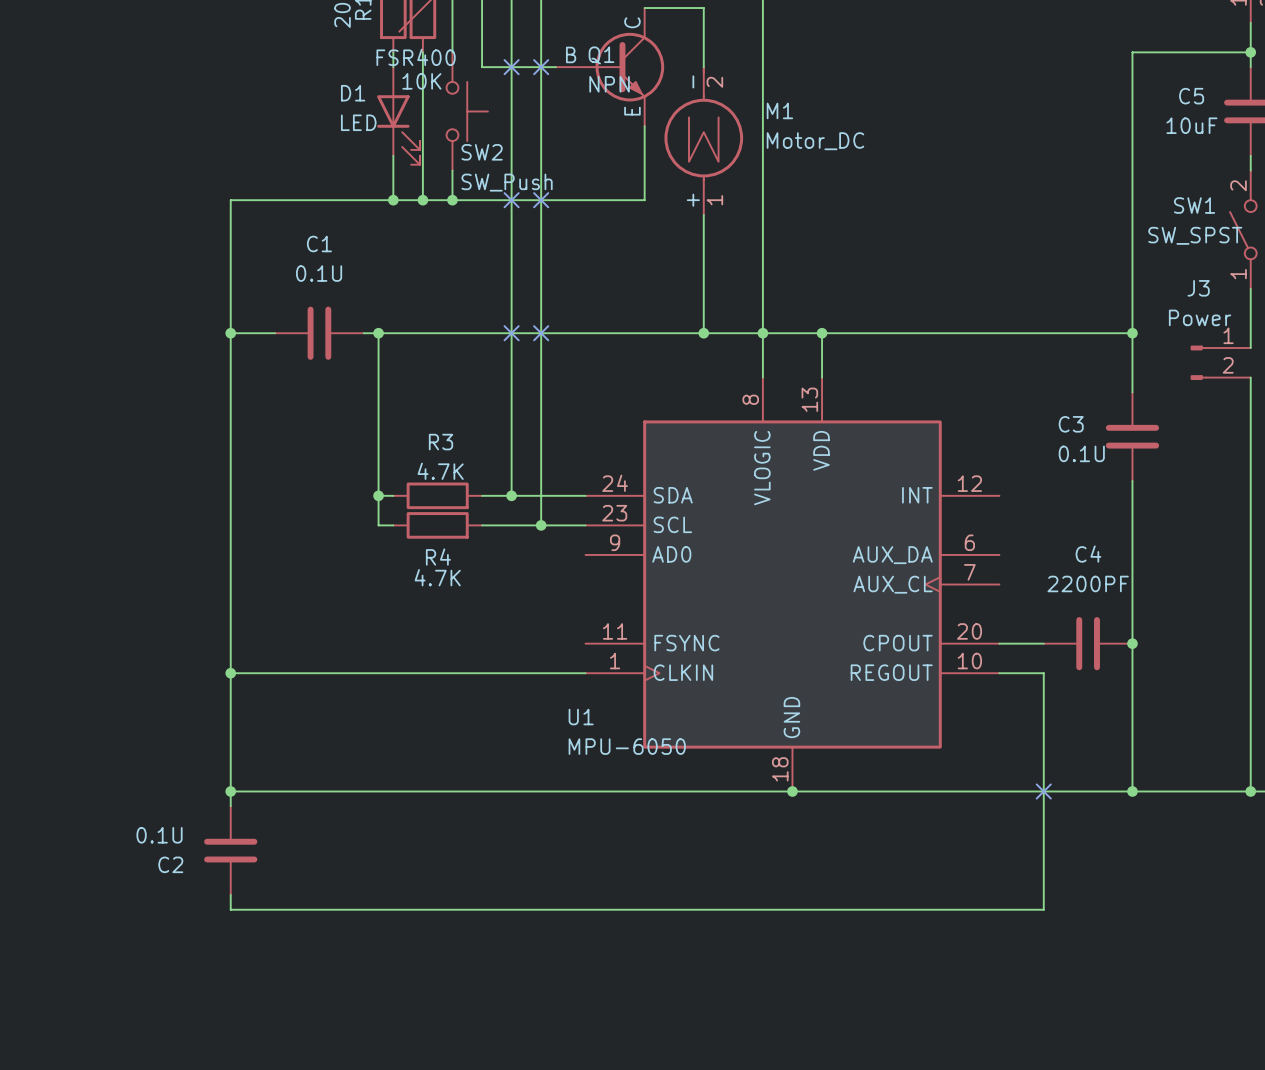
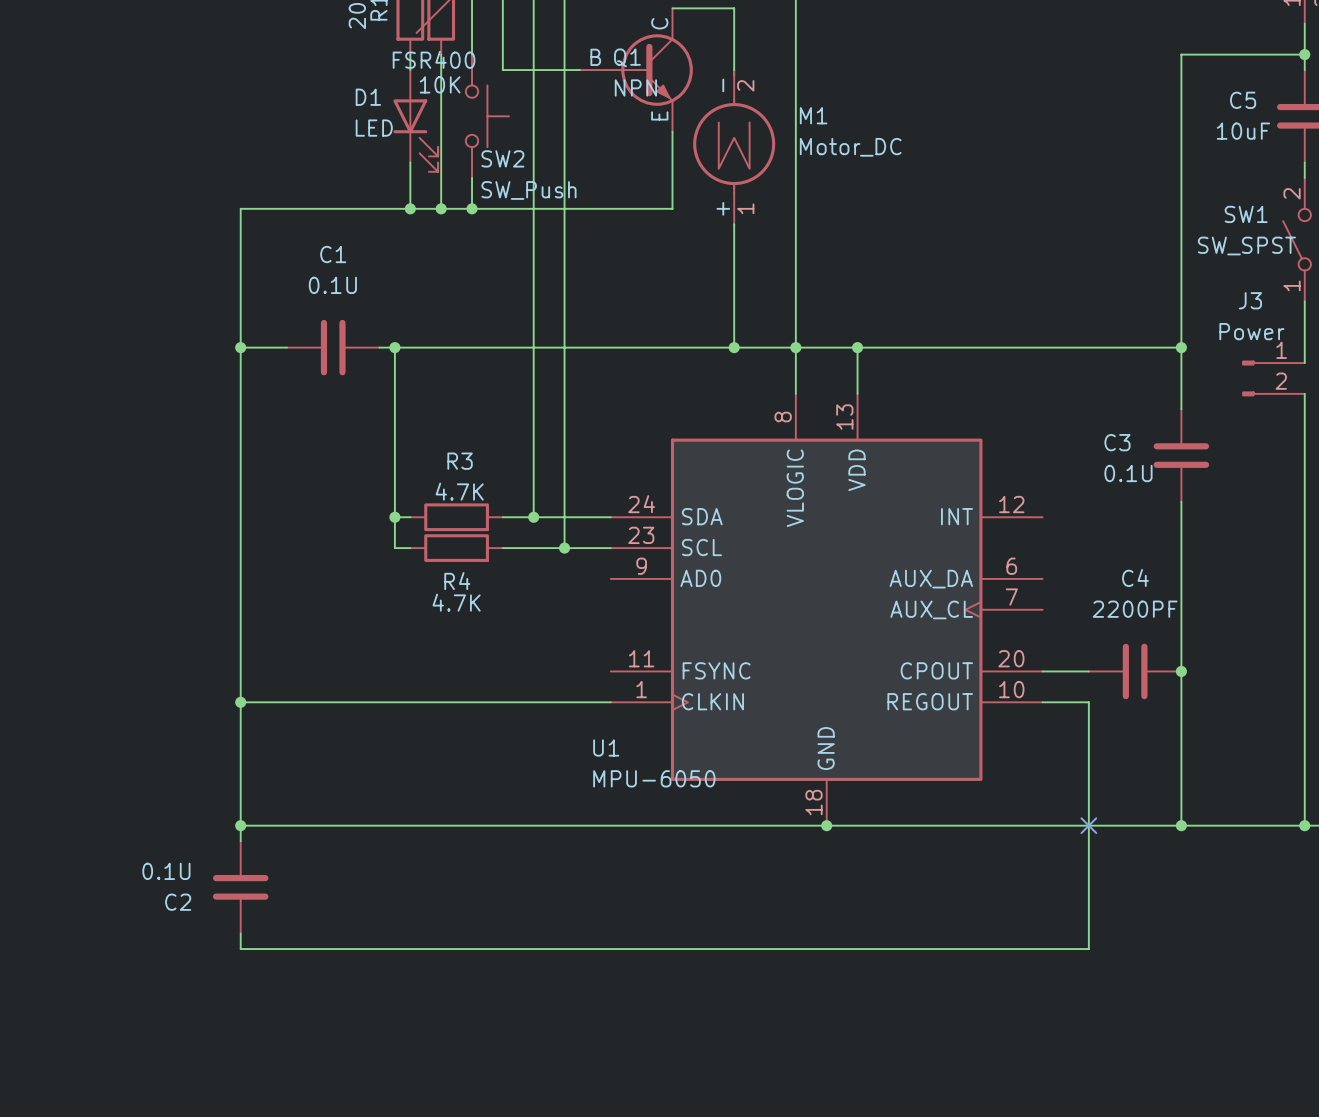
no-connect mark: (511, 67) -> none
no-connect mark: (541, 67) -> none
no-connect mark: (511, 200) -> none
no-connect mark: (541, 200) -> none
no-connect mark: (511, 333) -> none
no-connect mark: (541, 333) -> none

